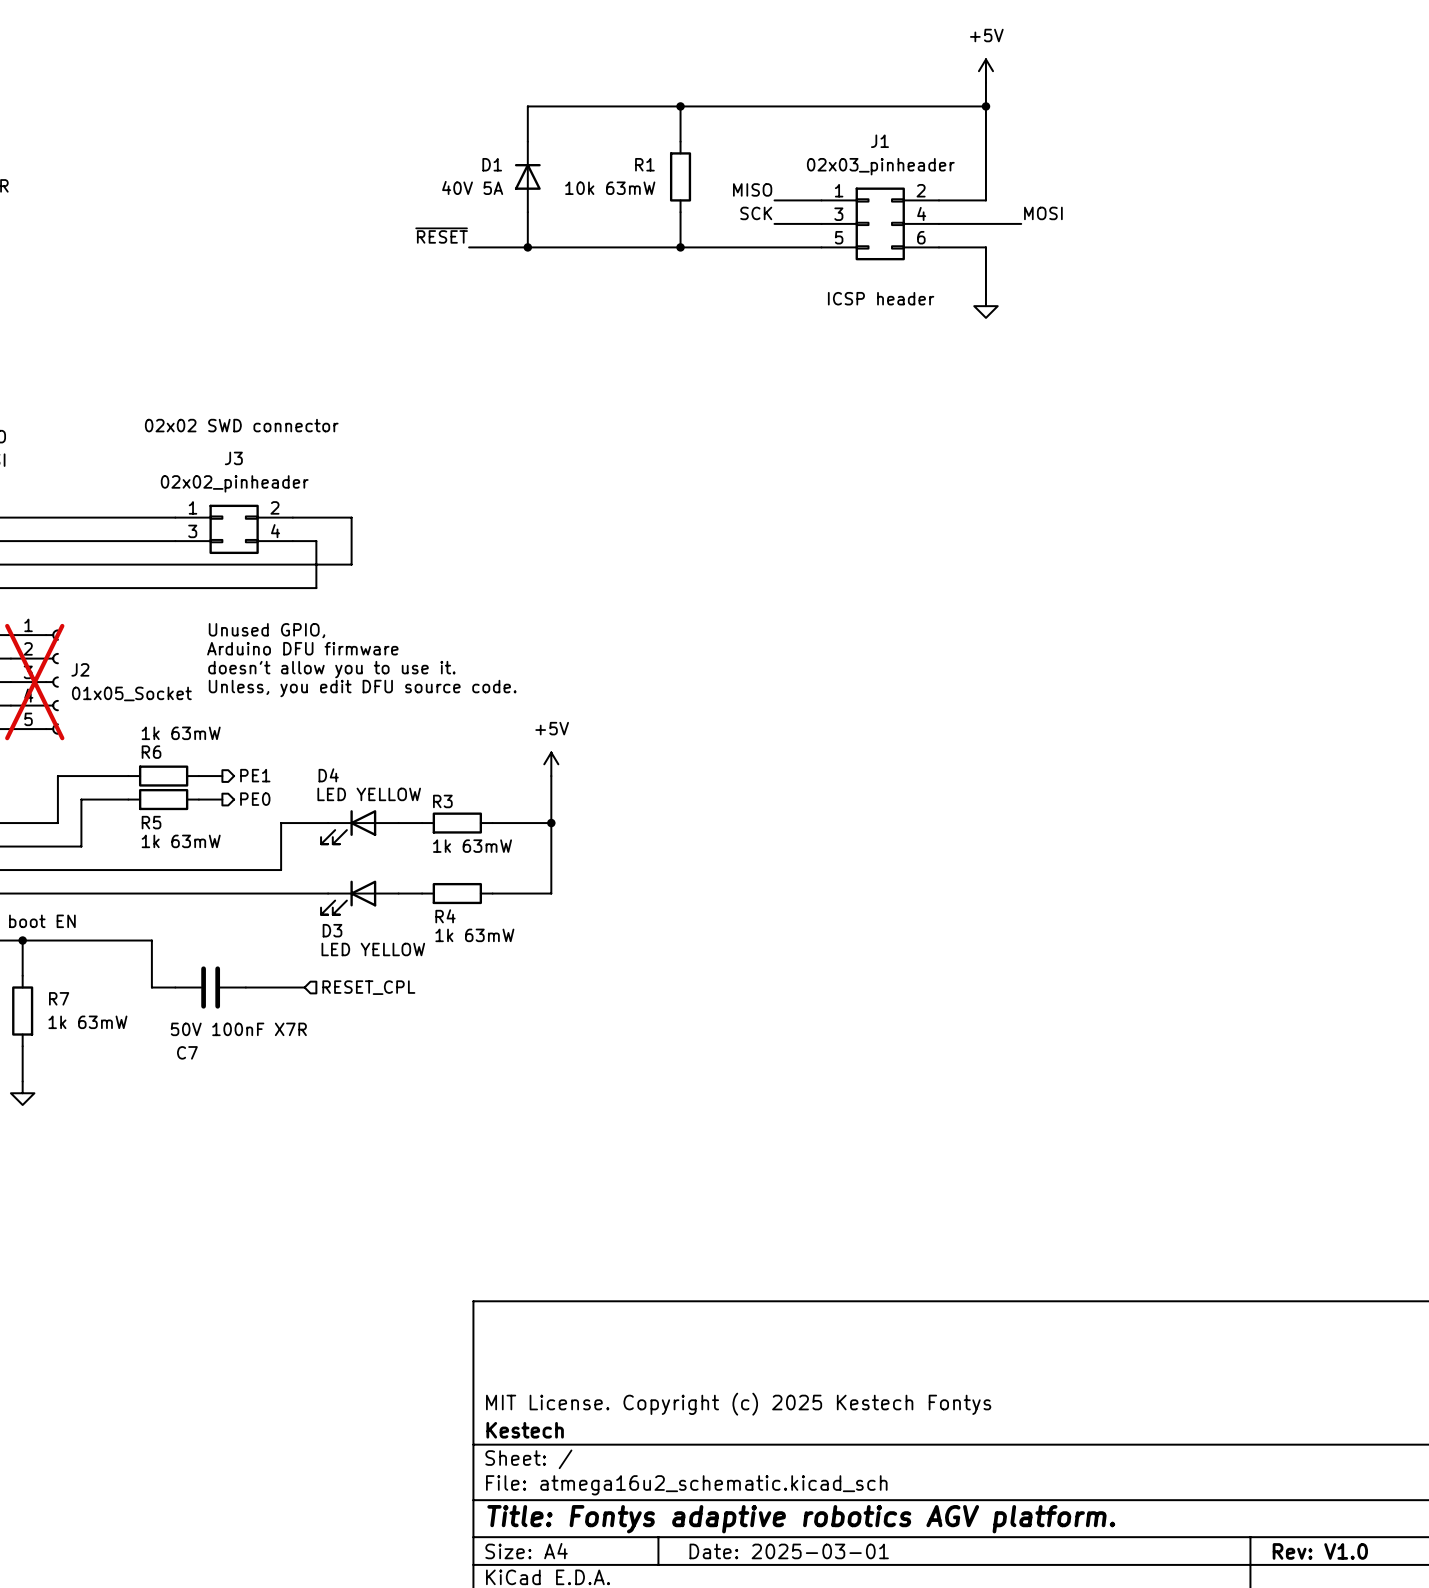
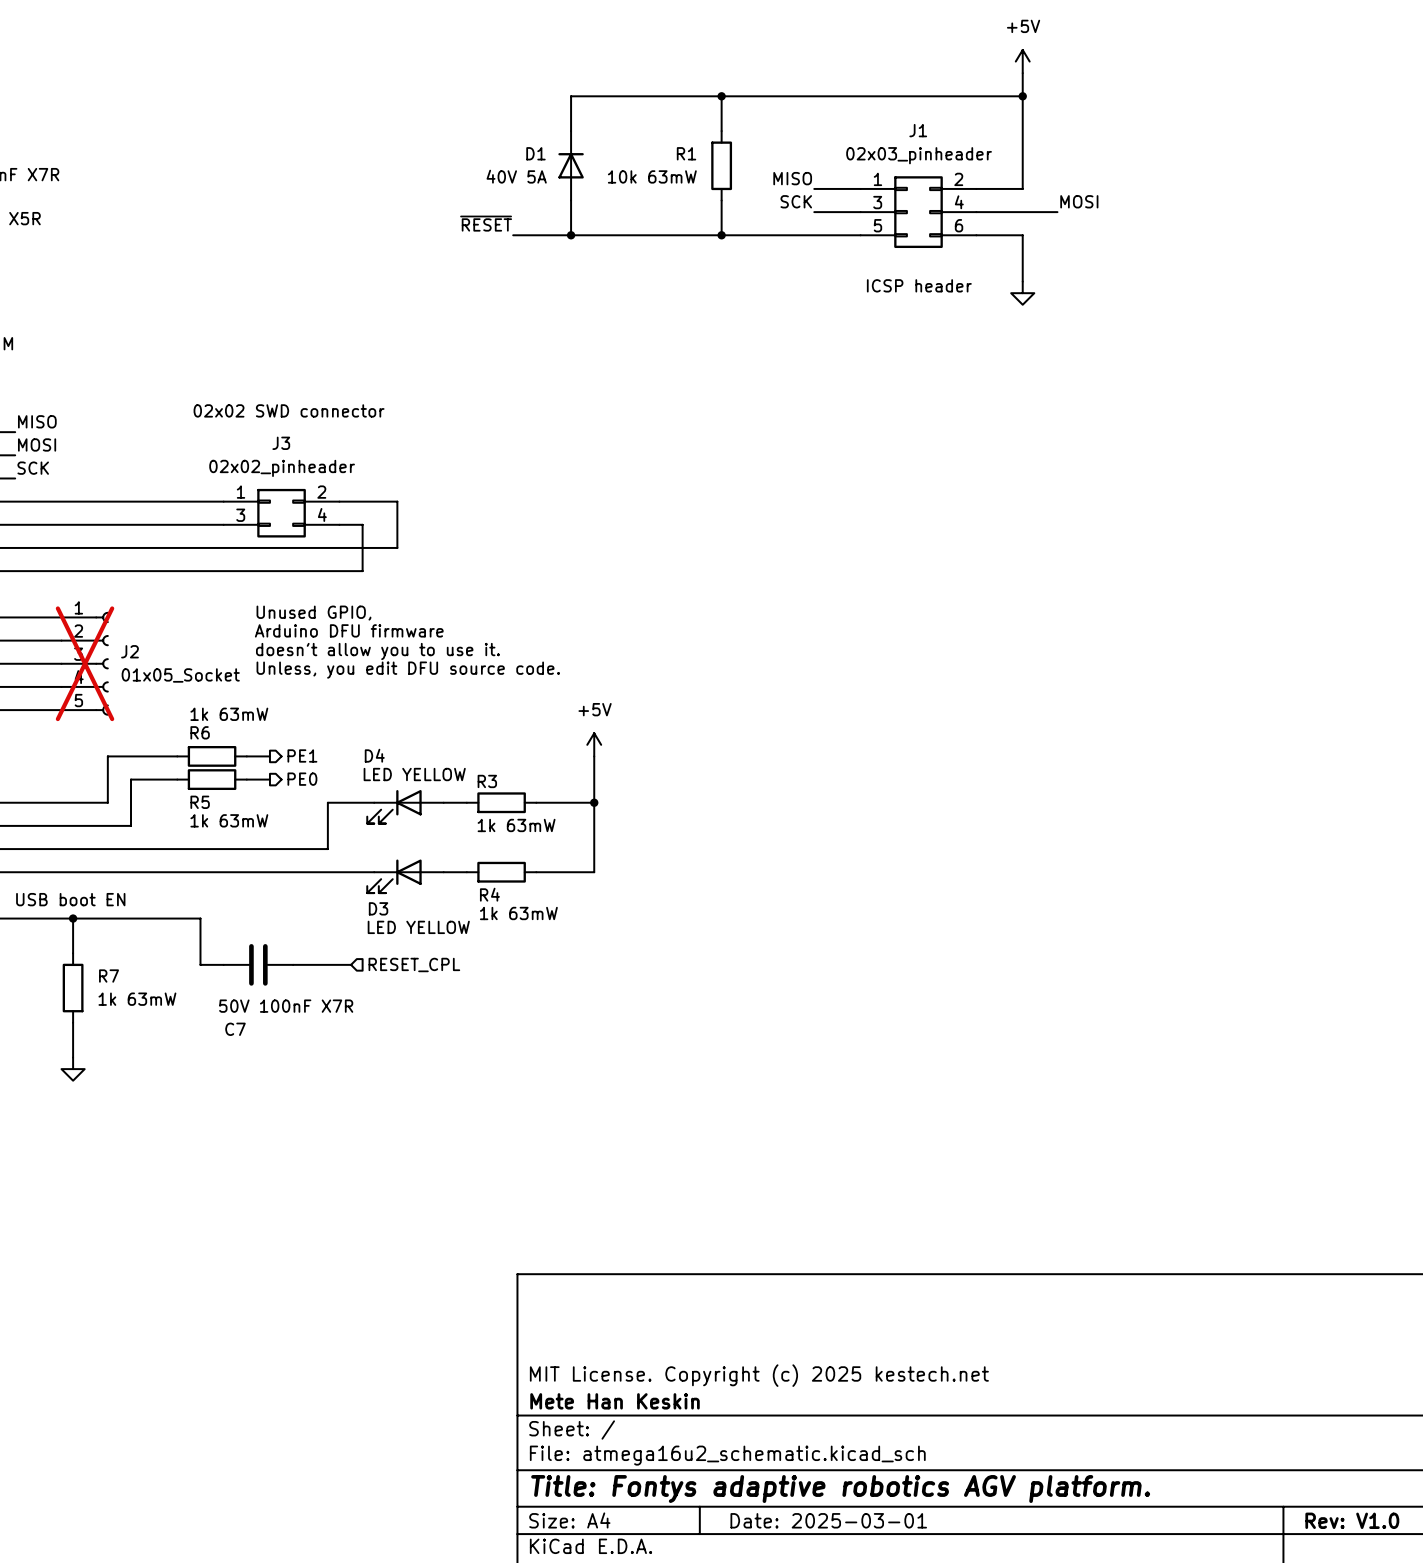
title block: MIT License. Copyright (c) 2025 Kestech Fontys (738, 1404) -> MIT License. Copyright (c) 2025 kestech.net (759, 1375)
title block: Kestech (525, 1430) -> Mete Han Keskin (615, 1401)

